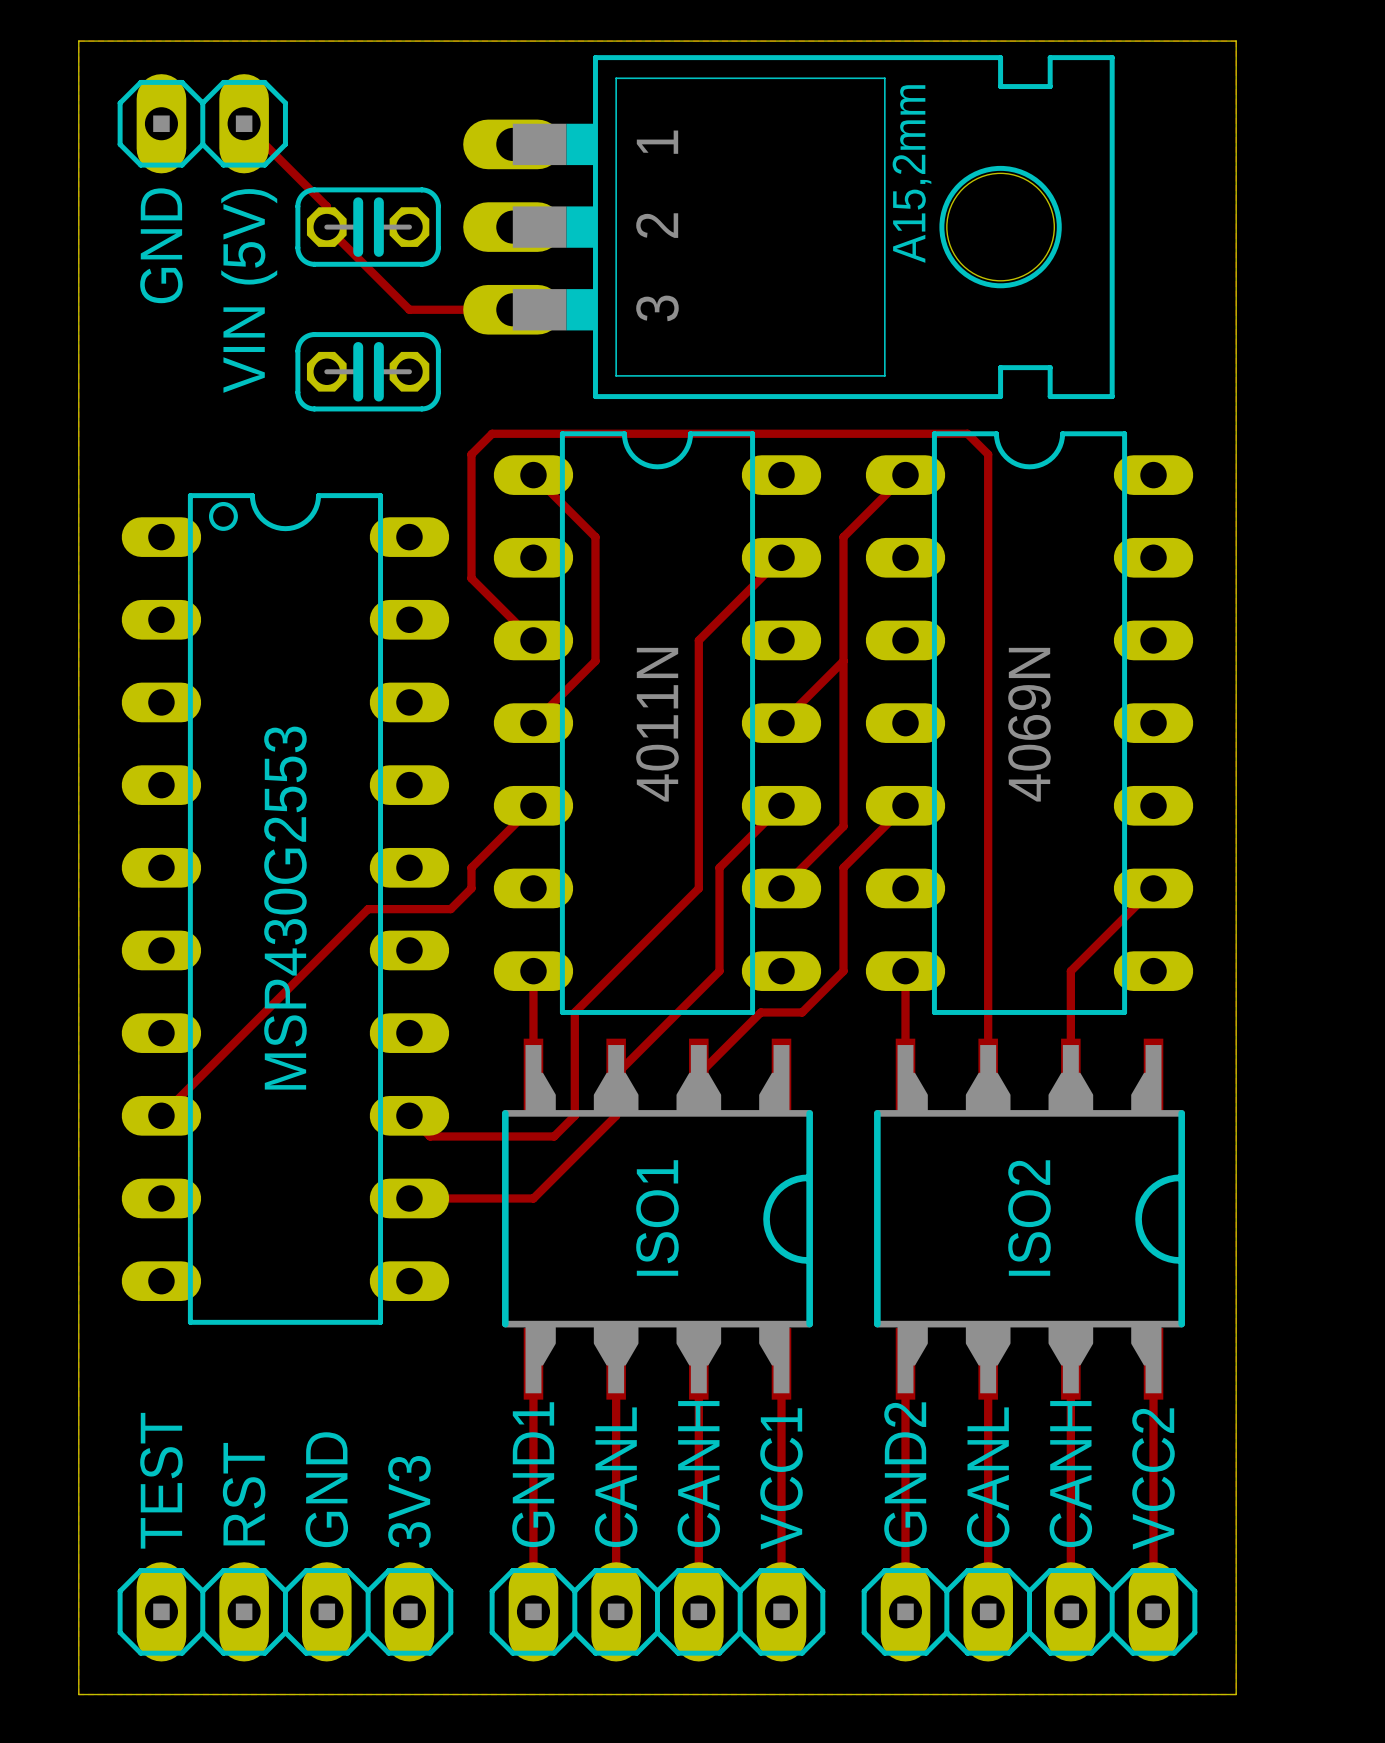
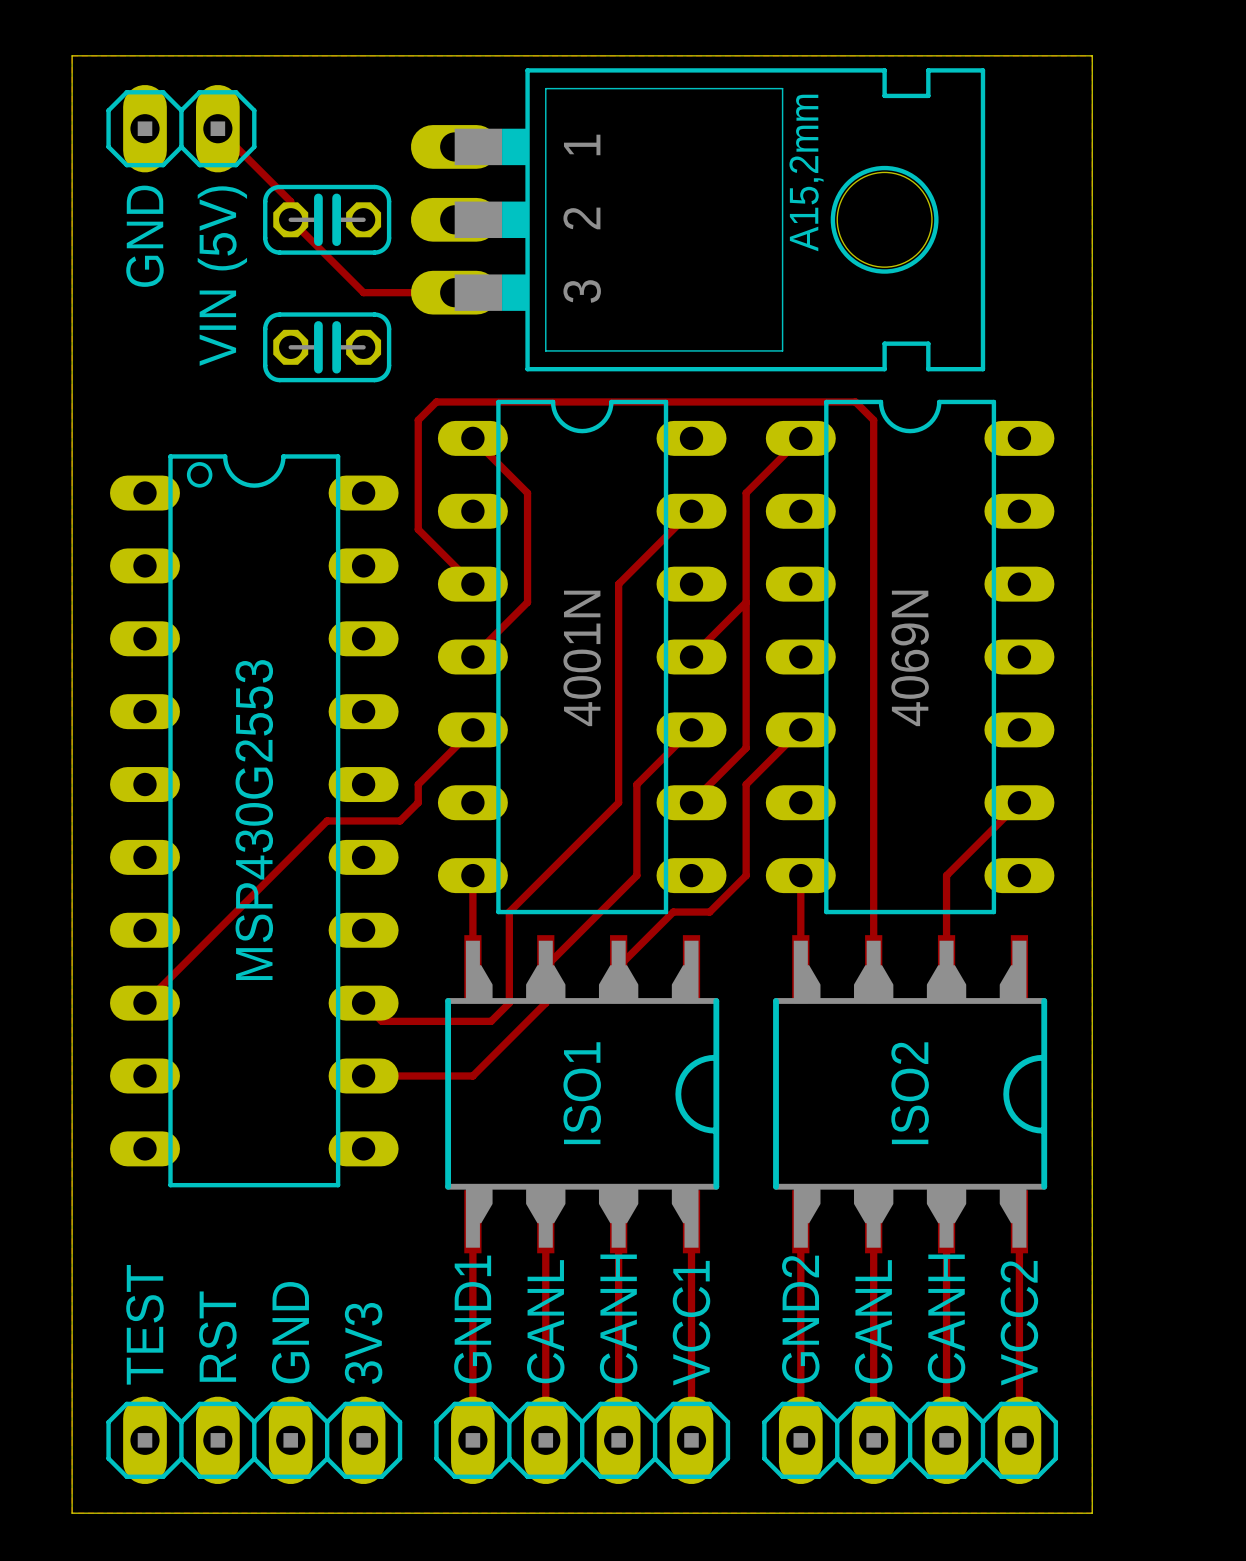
part value: 4011N (657, 724) -> 4001N (582, 658)

